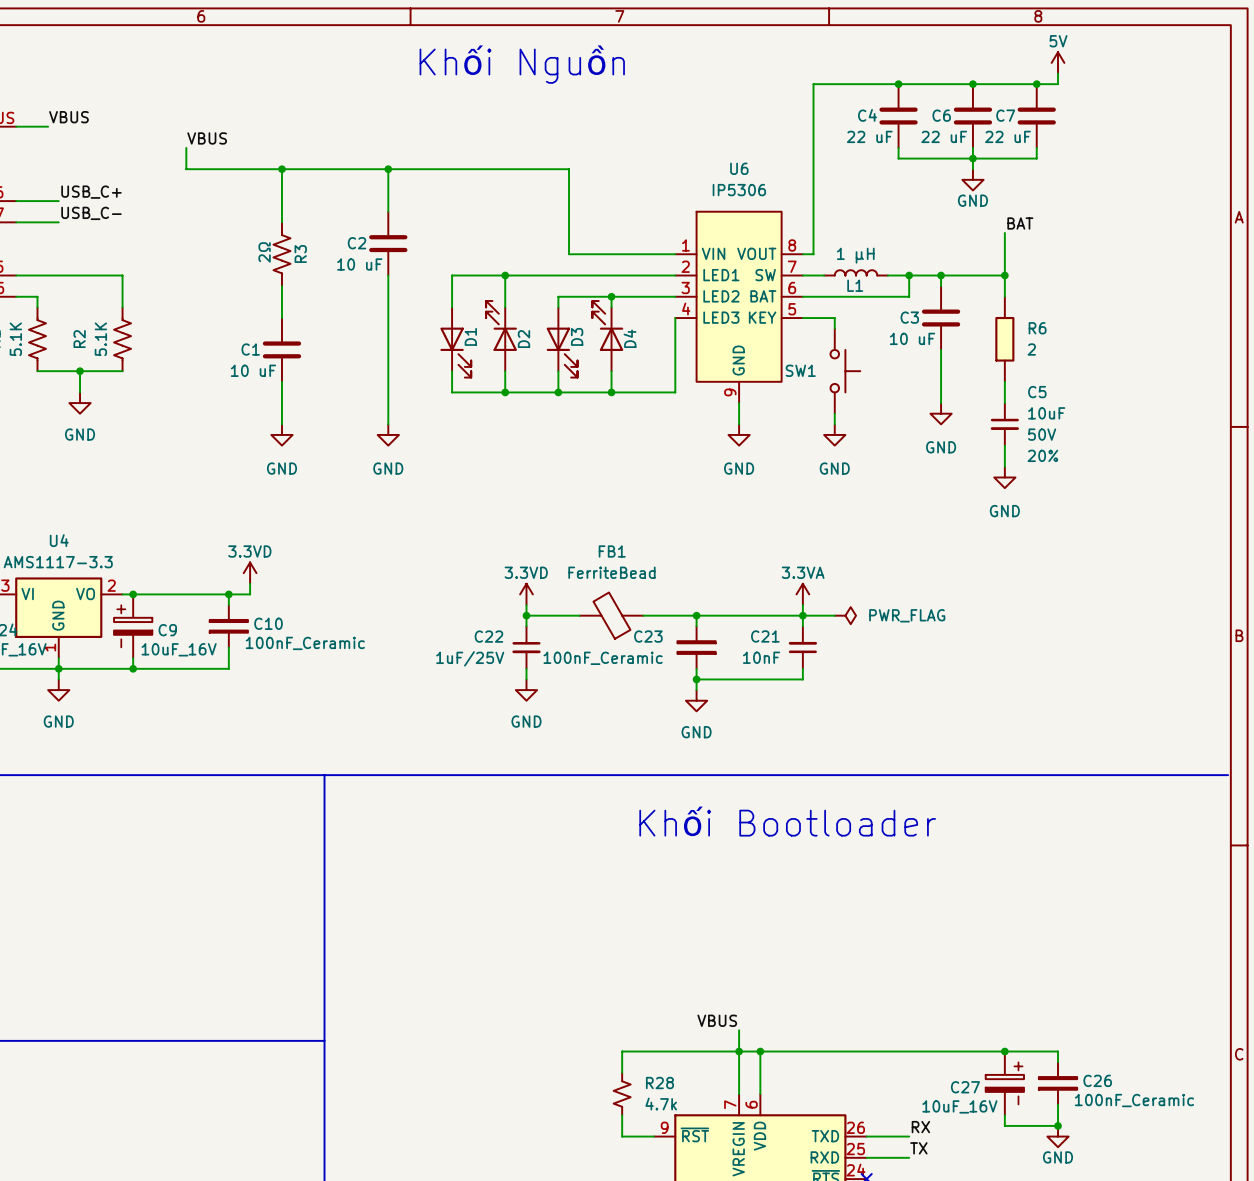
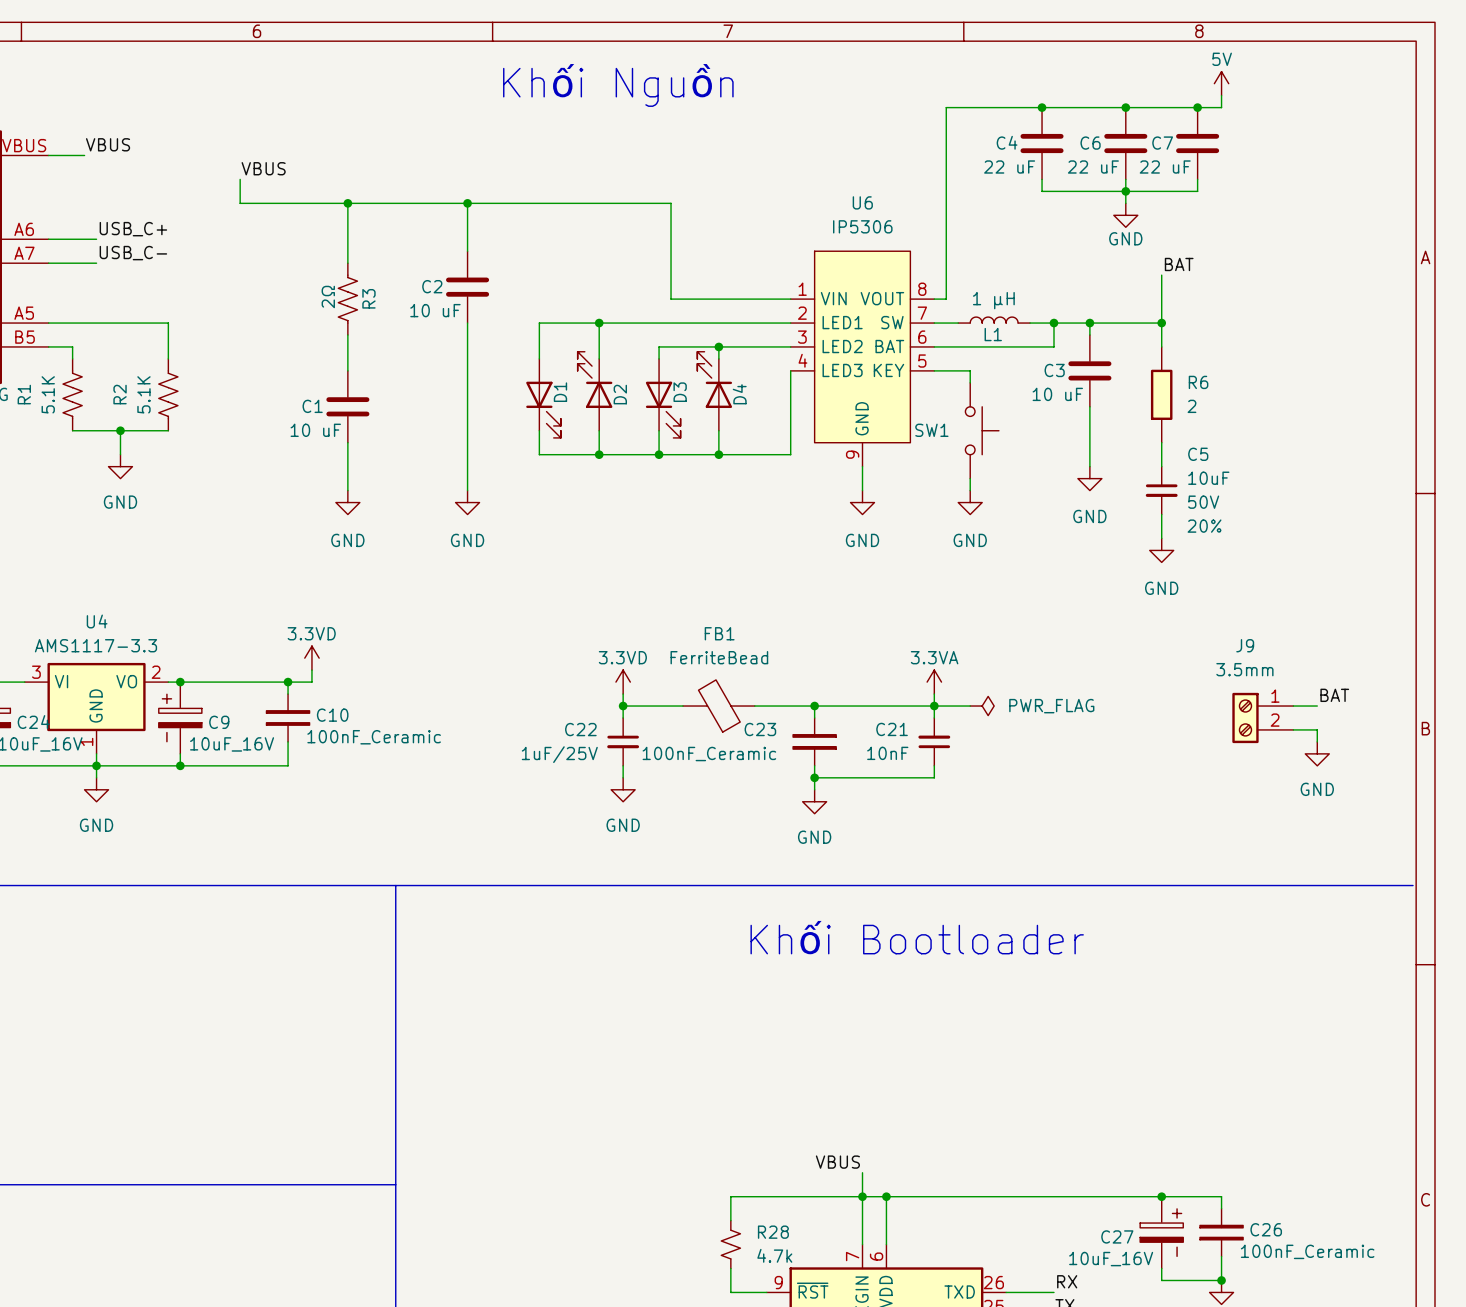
label: none -> BAT (1334, 695)
wire: none -> (1293, 706) (1317, 706)
J9: none -> 3.5mm (1262, 717)
wire: none -> (1293, 729) (1317, 729) (1317, 741)
power symbol: none -> GND (1317, 753)

